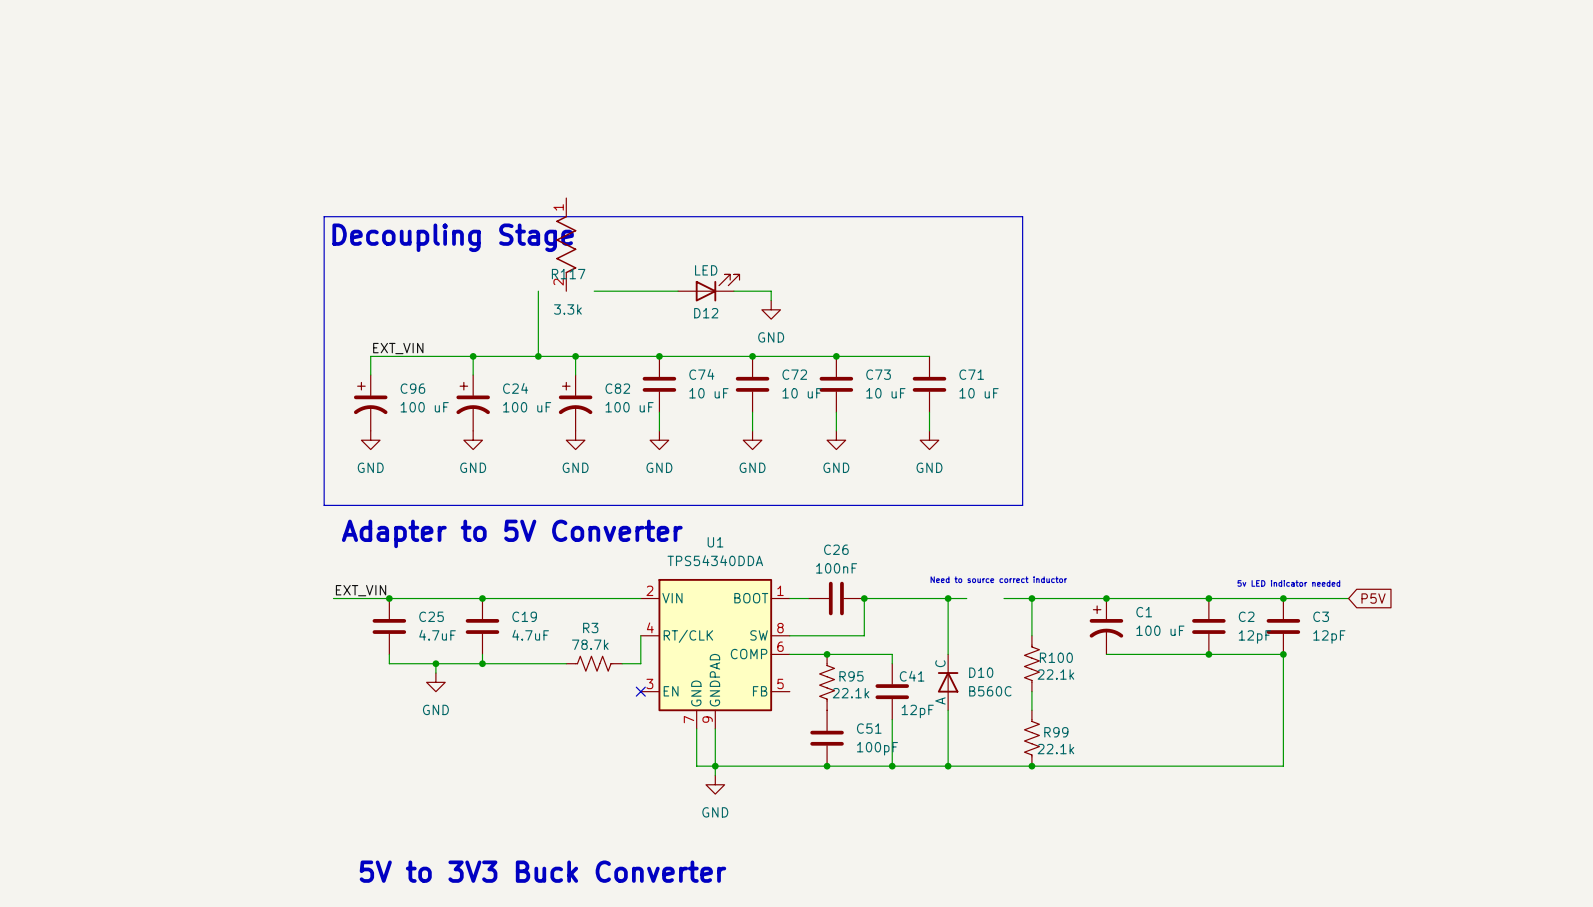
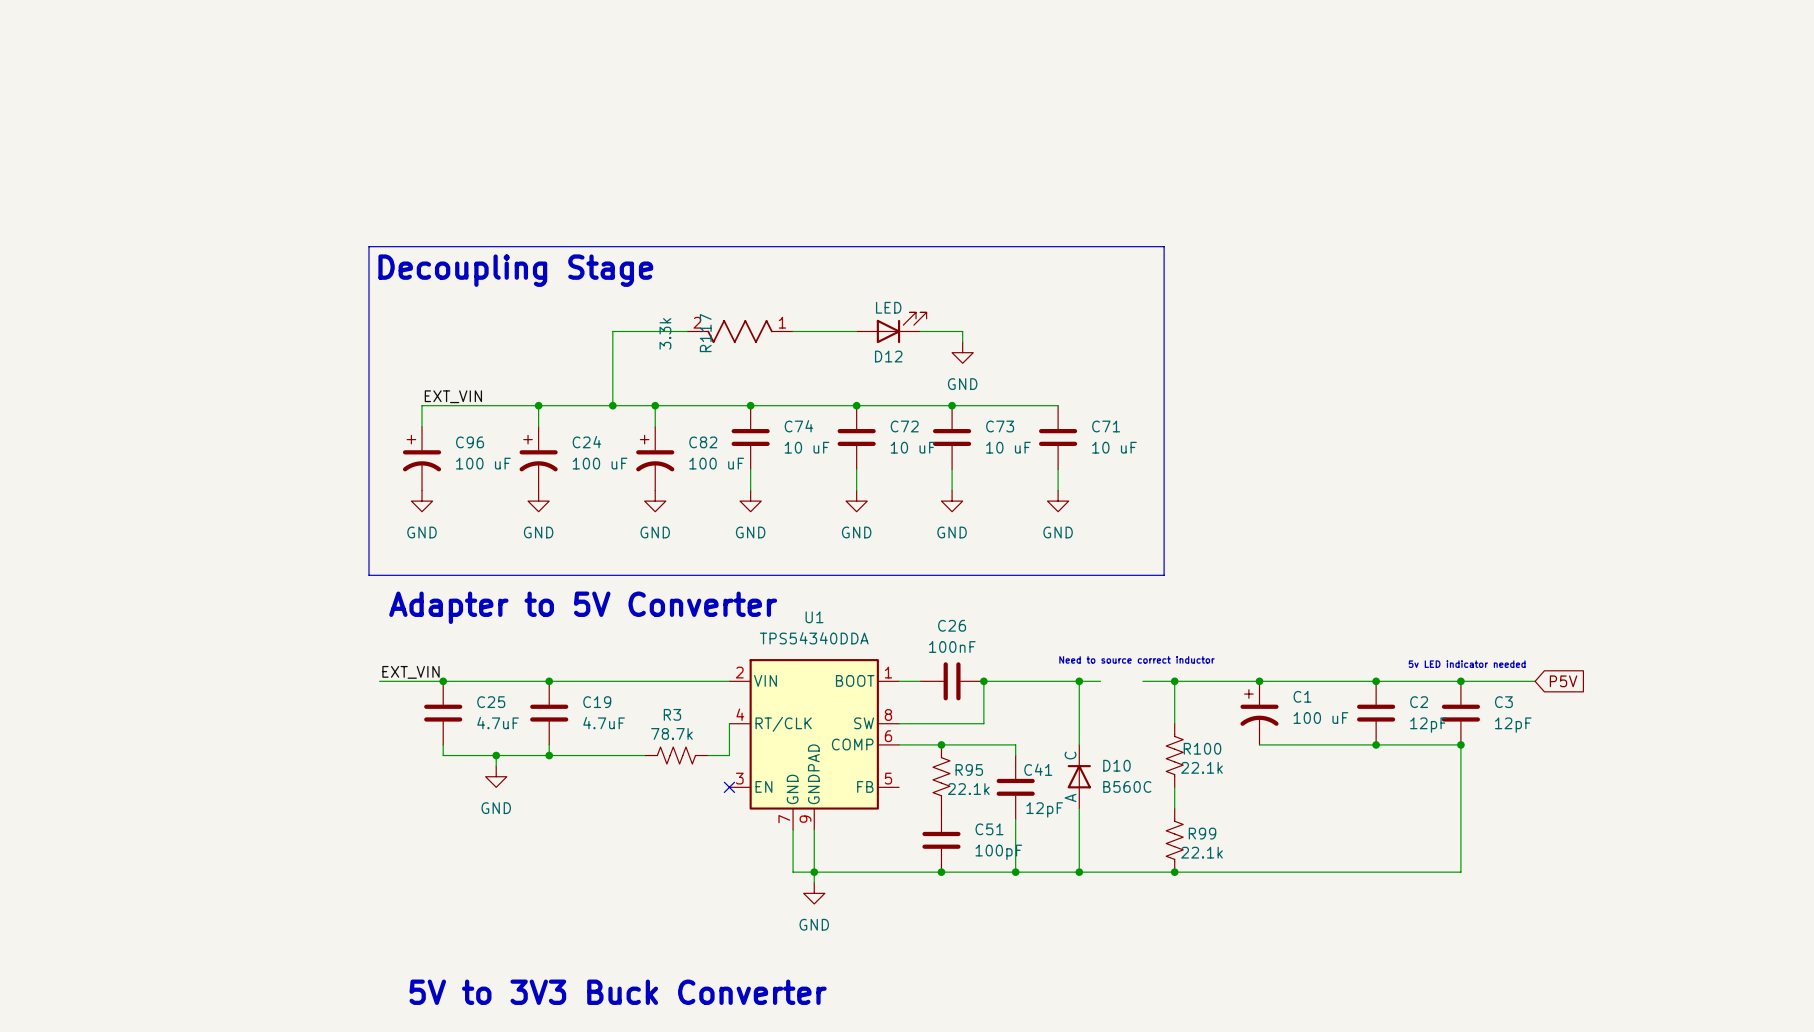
R117 rotation: 0° (566, 244) -> 90° clockwise (740, 331)
R117 position: (566, 244) -> (740, 331)
D12 position: (708, 287) -> (891, 327)
wire: none -> (612, 331) (676, 331)
wire: (603, 291) (678, 291) -> none
wire: none -> (920, 331) (962, 331) (962, 342)
power symbol position: GND (771, 309) -> GND (962, 352)

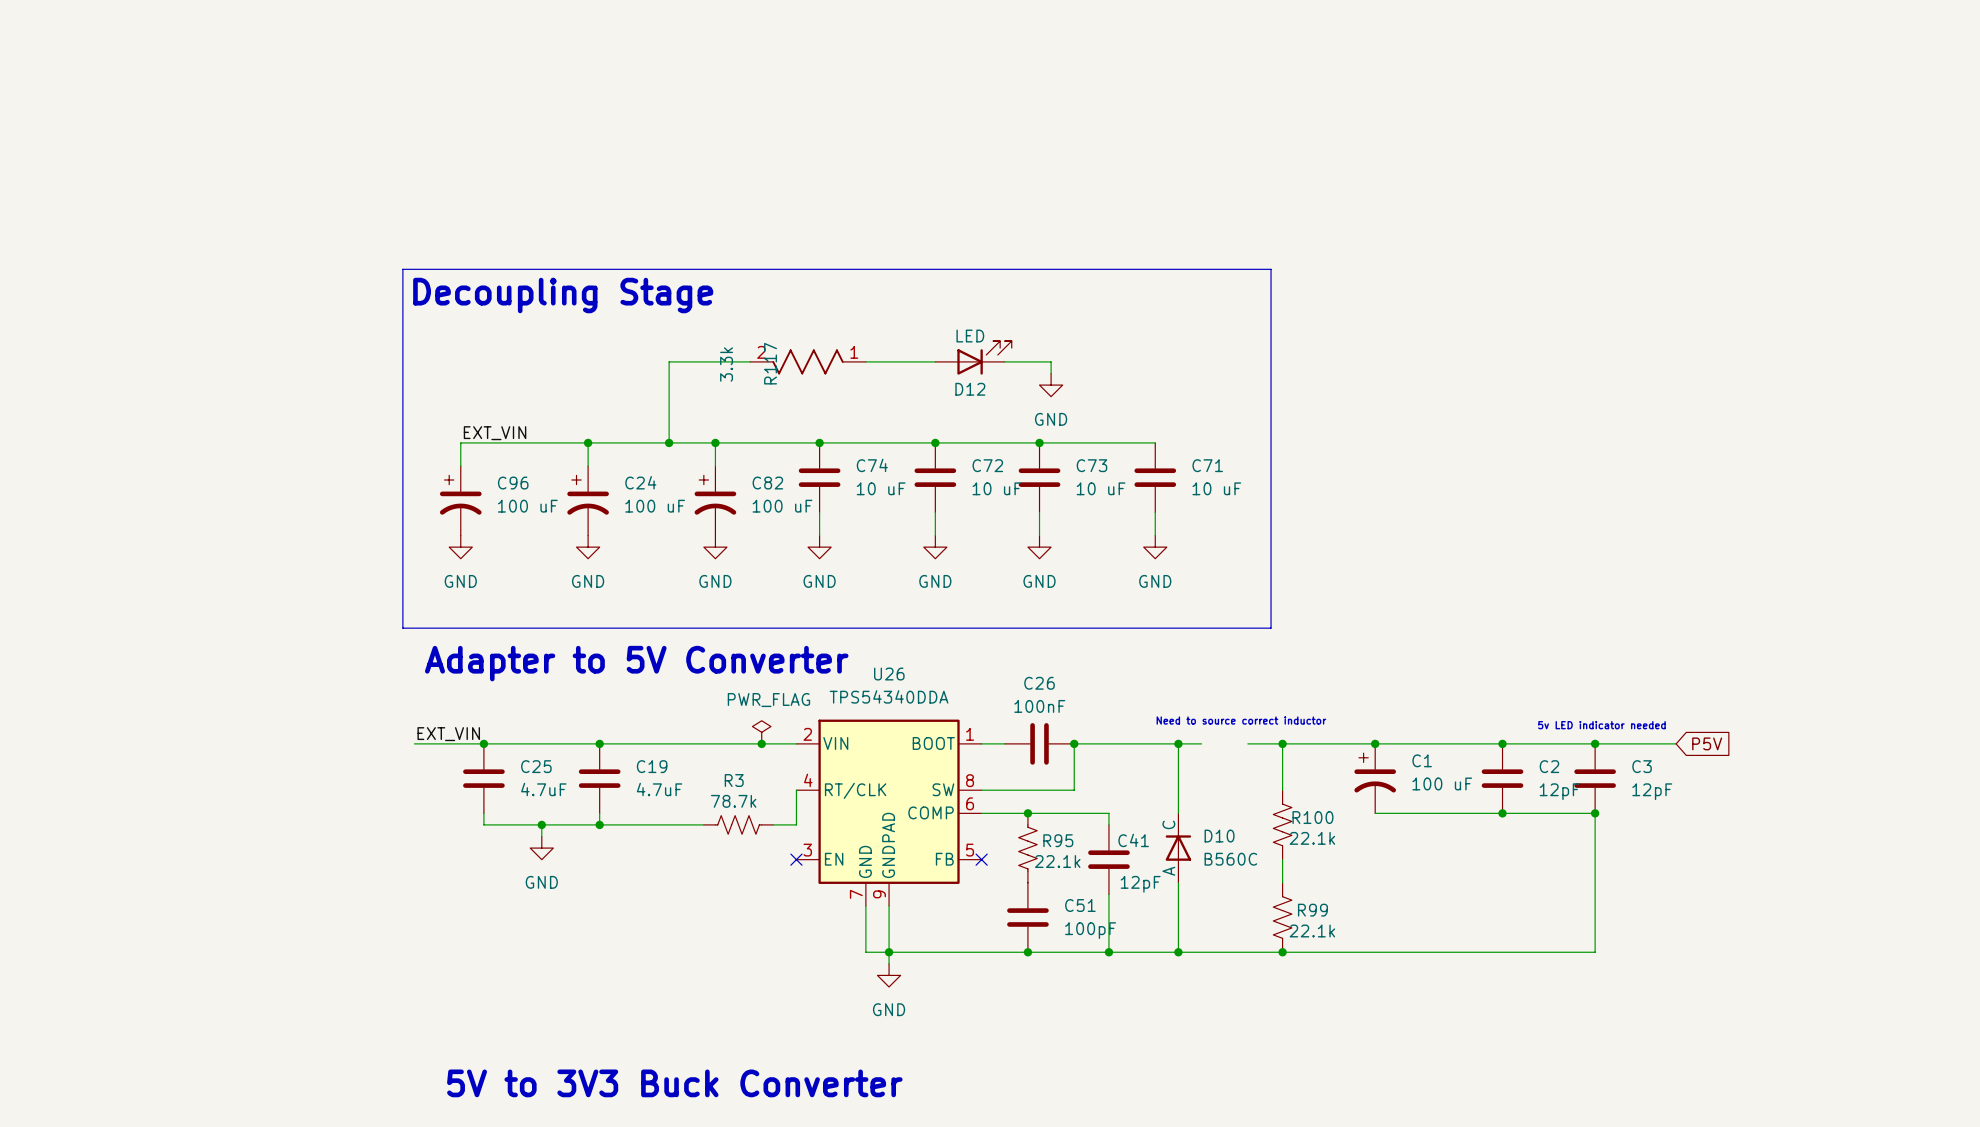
U1 name: U1 (814, 617) -> U26 (889, 674)
power symbol: none -> PWR_FLAG (761, 732)
junction: none -> (761, 743)
no-connect mark: none -> (981, 859)

